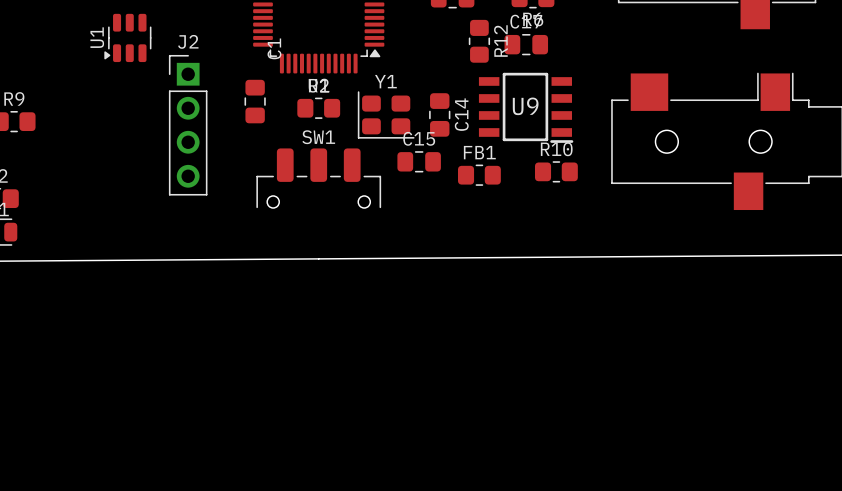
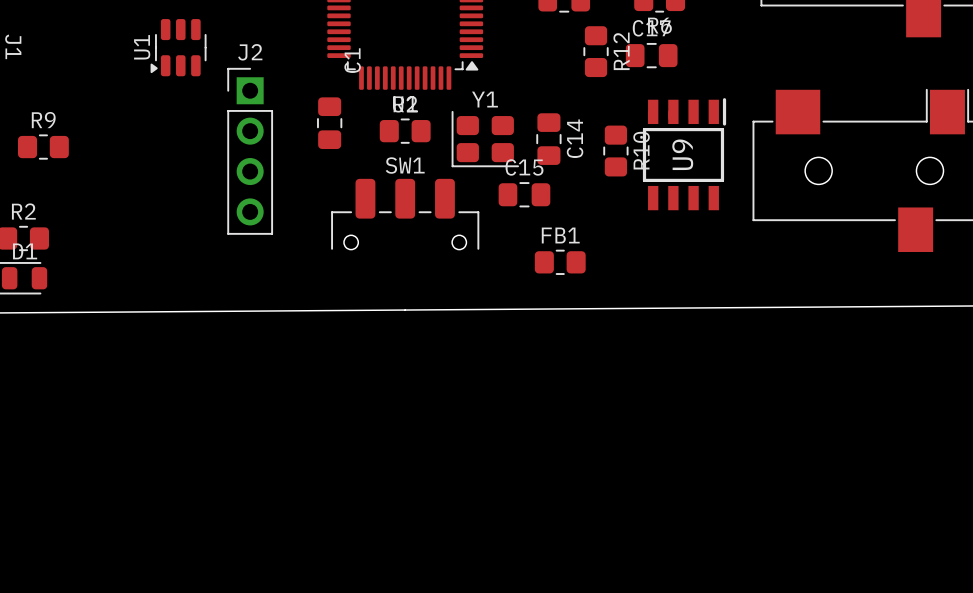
U9 rotation: 0° (526, 107) -> 90° counterclockwise (684, 154)
R10 rotation: 0° (556, 171) -> 90° clockwise (615, 151)
R10 position: (556, 171) -> (615, 151)
FB1 position: (479, 175) -> (560, 262)

